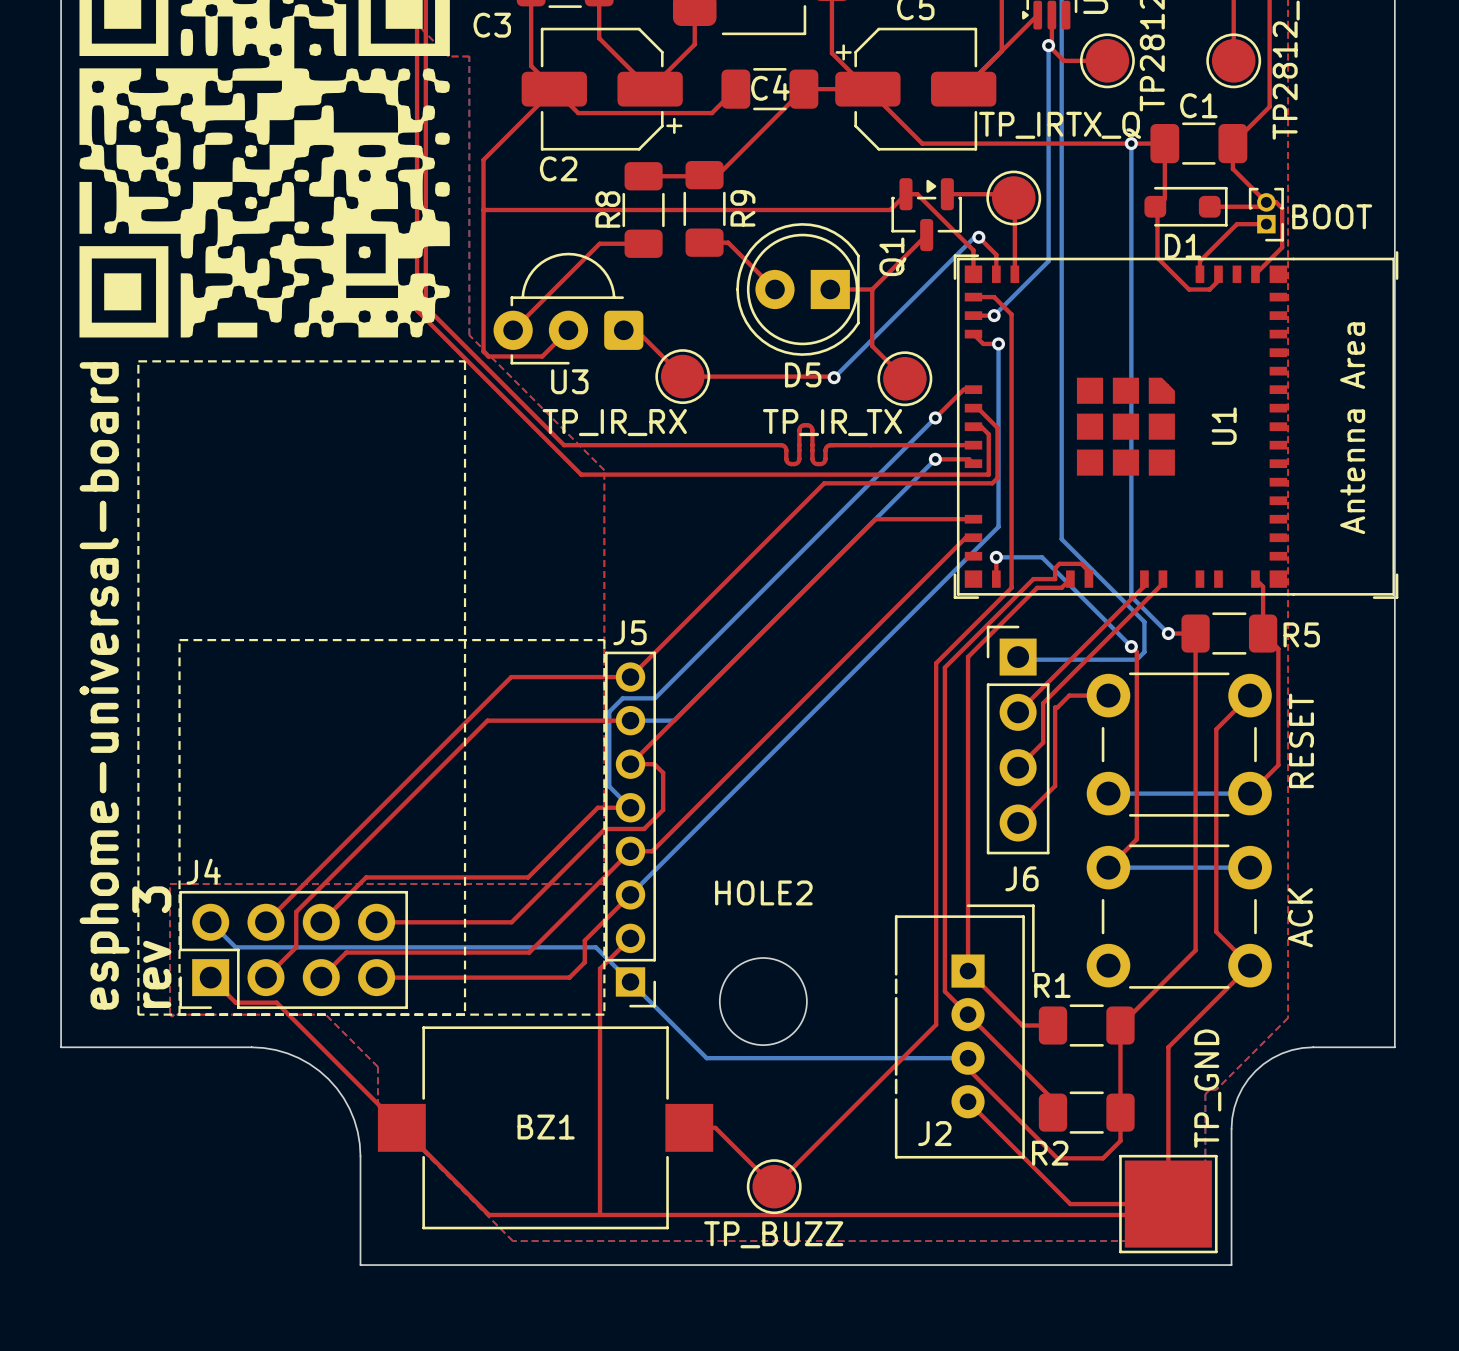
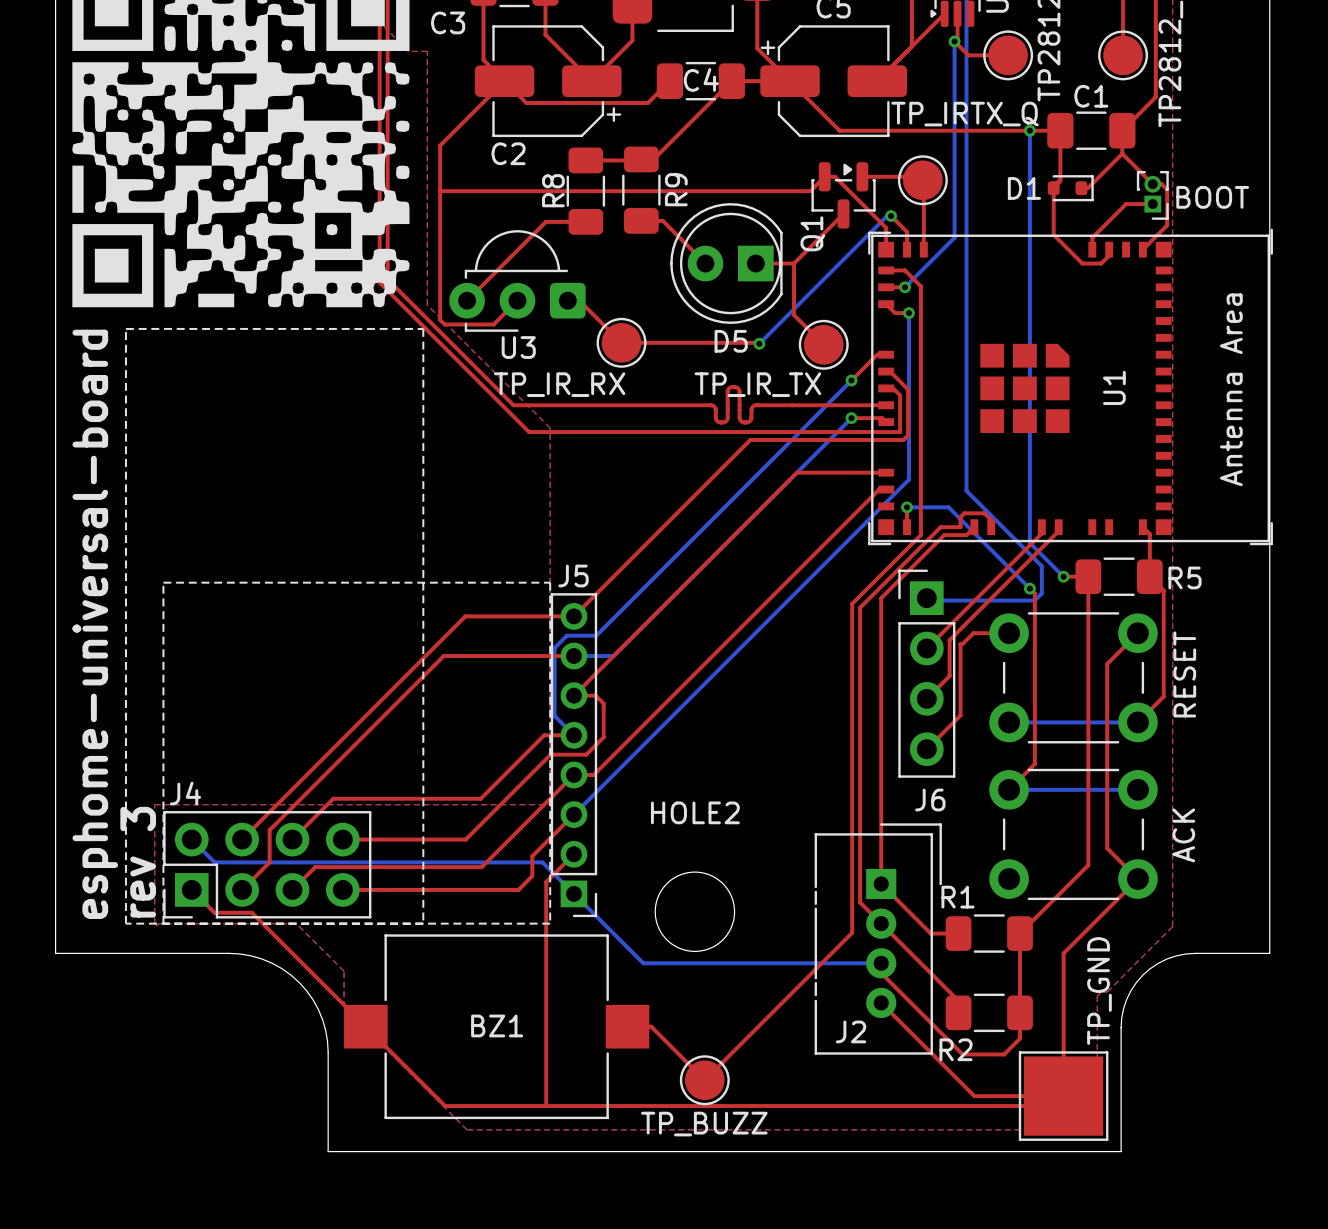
top track: none -> (1122, 153) (1087, 188) (1081, 188)
D1 footprint: [1144, 186, 1228, 227] -> [1047, 175, 1094, 202]
top track: (1266, 202) (1262, 206) (1209, 206) -> none
D1 name position: D1 (1183, 246) -> D1 (1024, 188)

